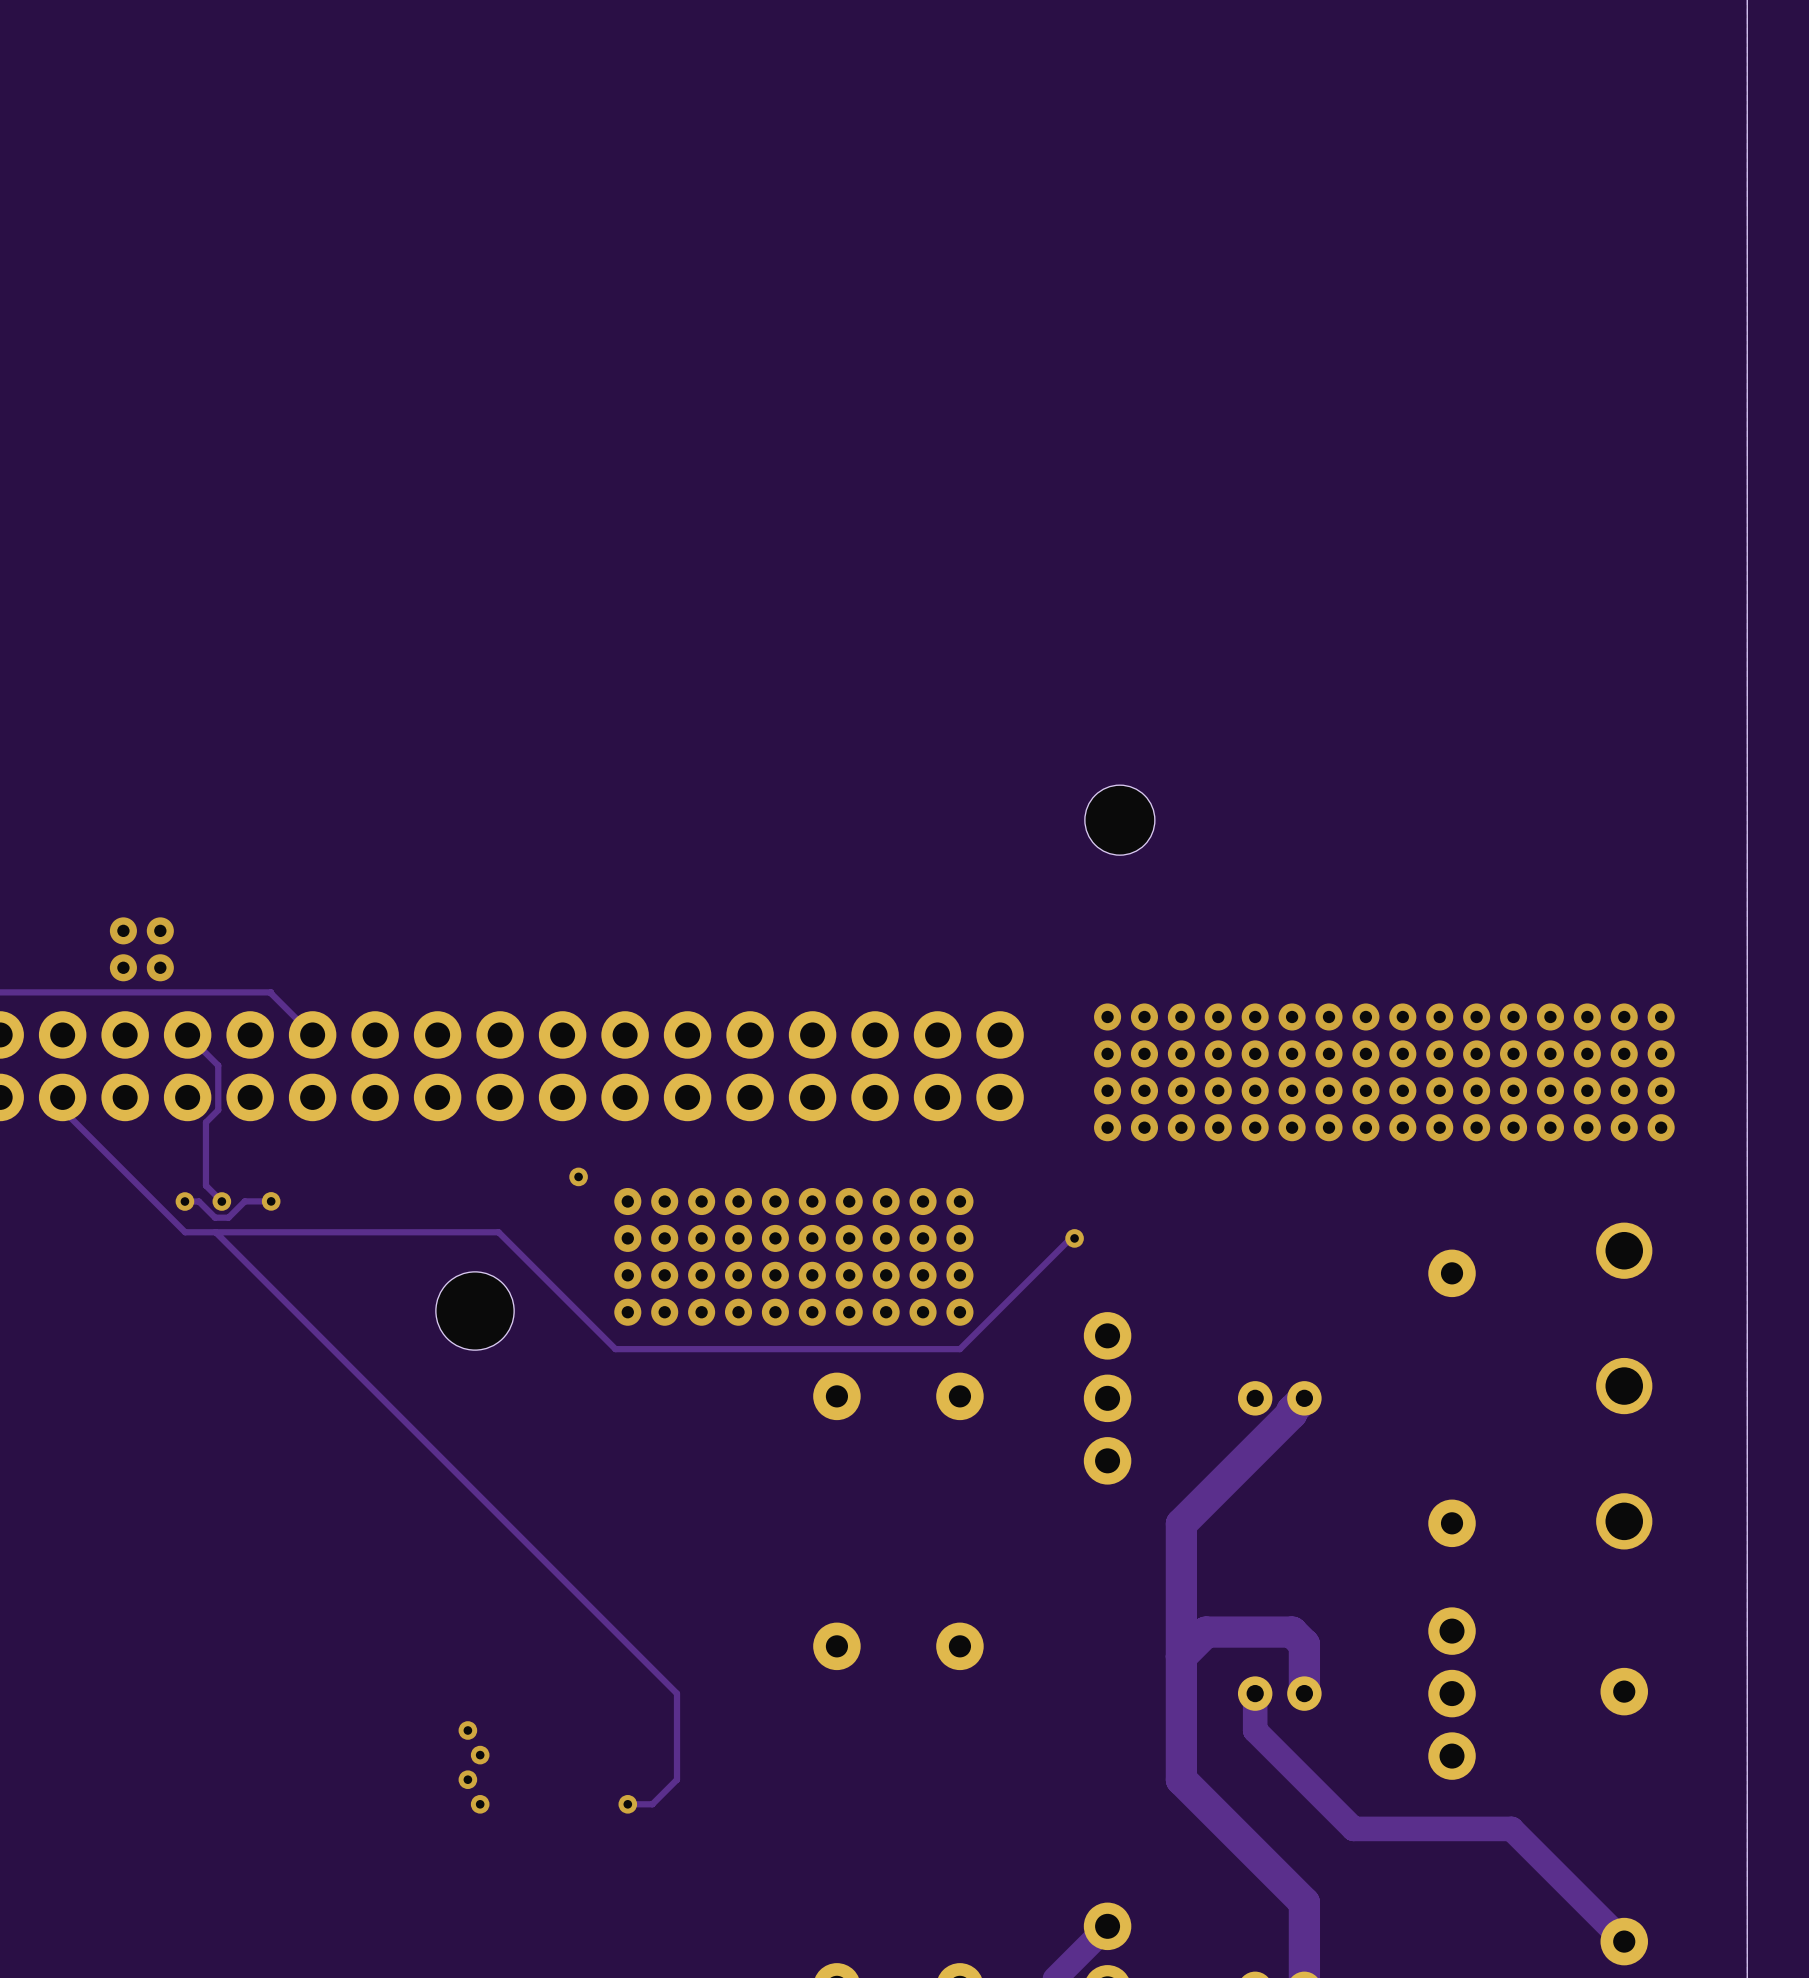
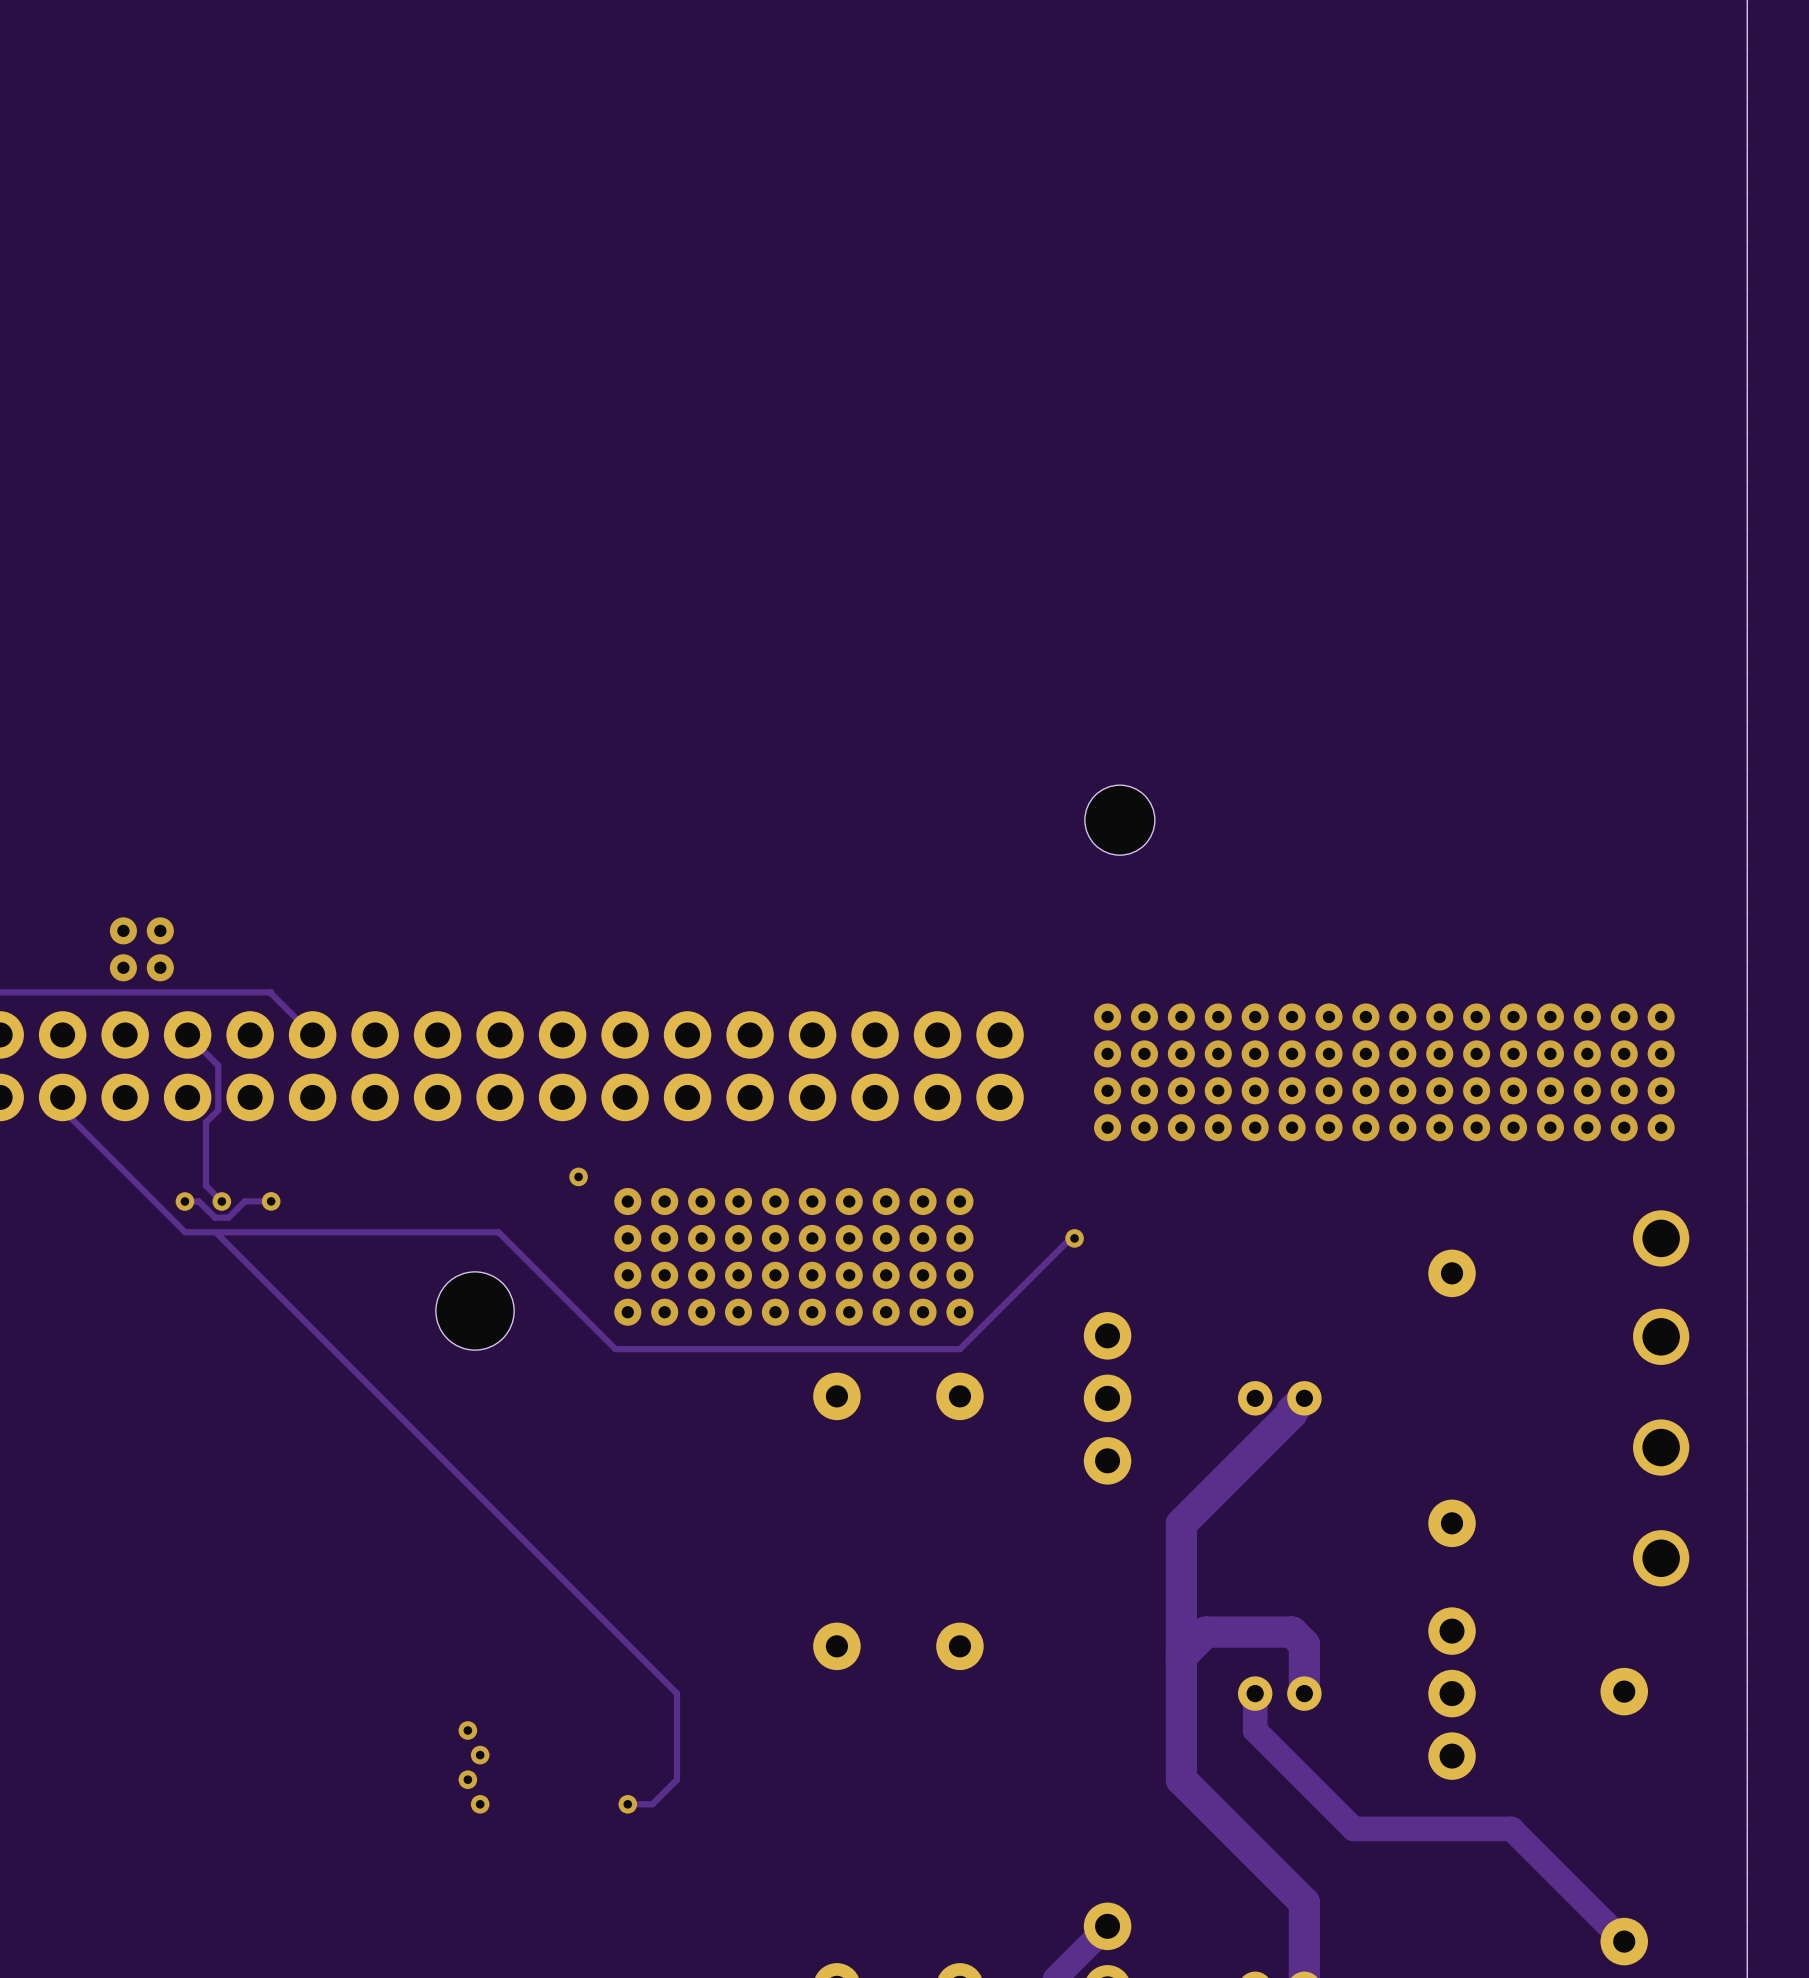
part position: (1624, 1250) -> (1661, 1238)
part: none -> (1661, 1336)
part: (1624, 1386) -> none
part: none -> (1661, 1447)
part: (1624, 1521) -> none
part: none -> (1661, 1558)

